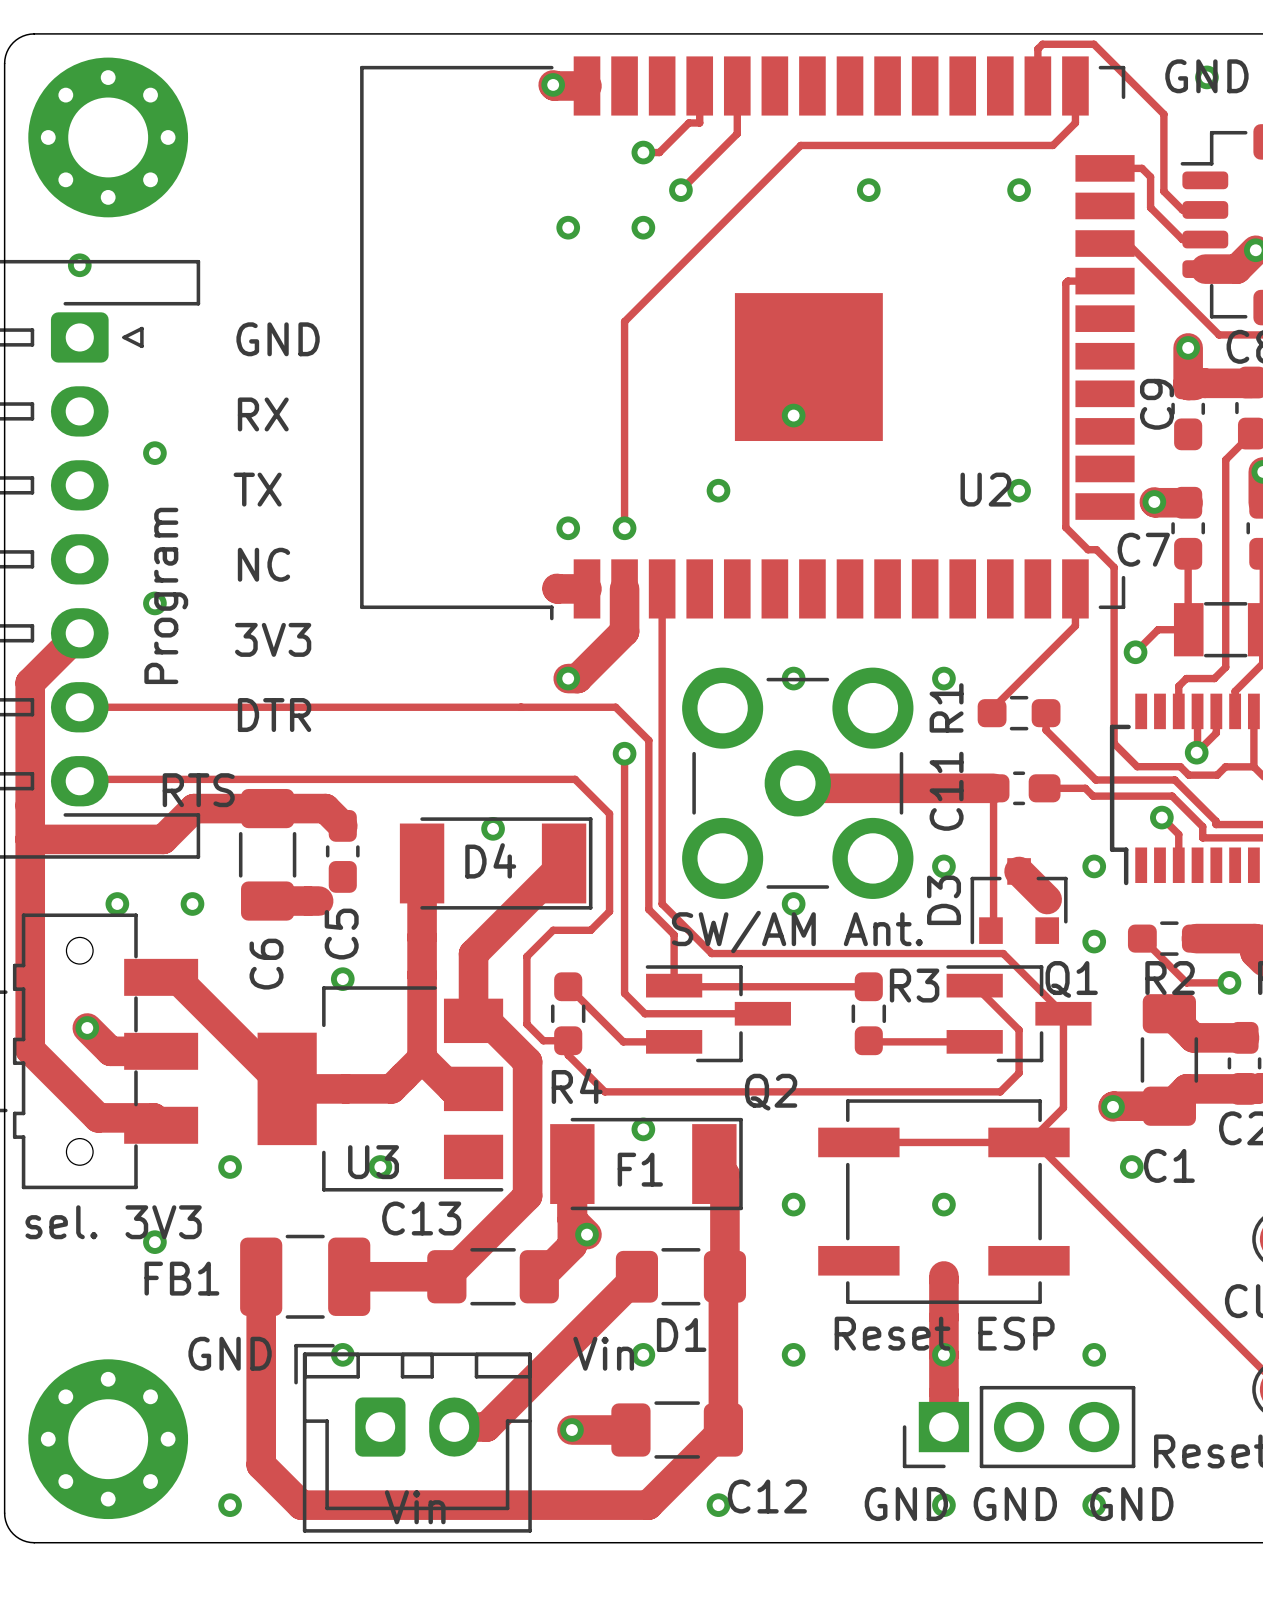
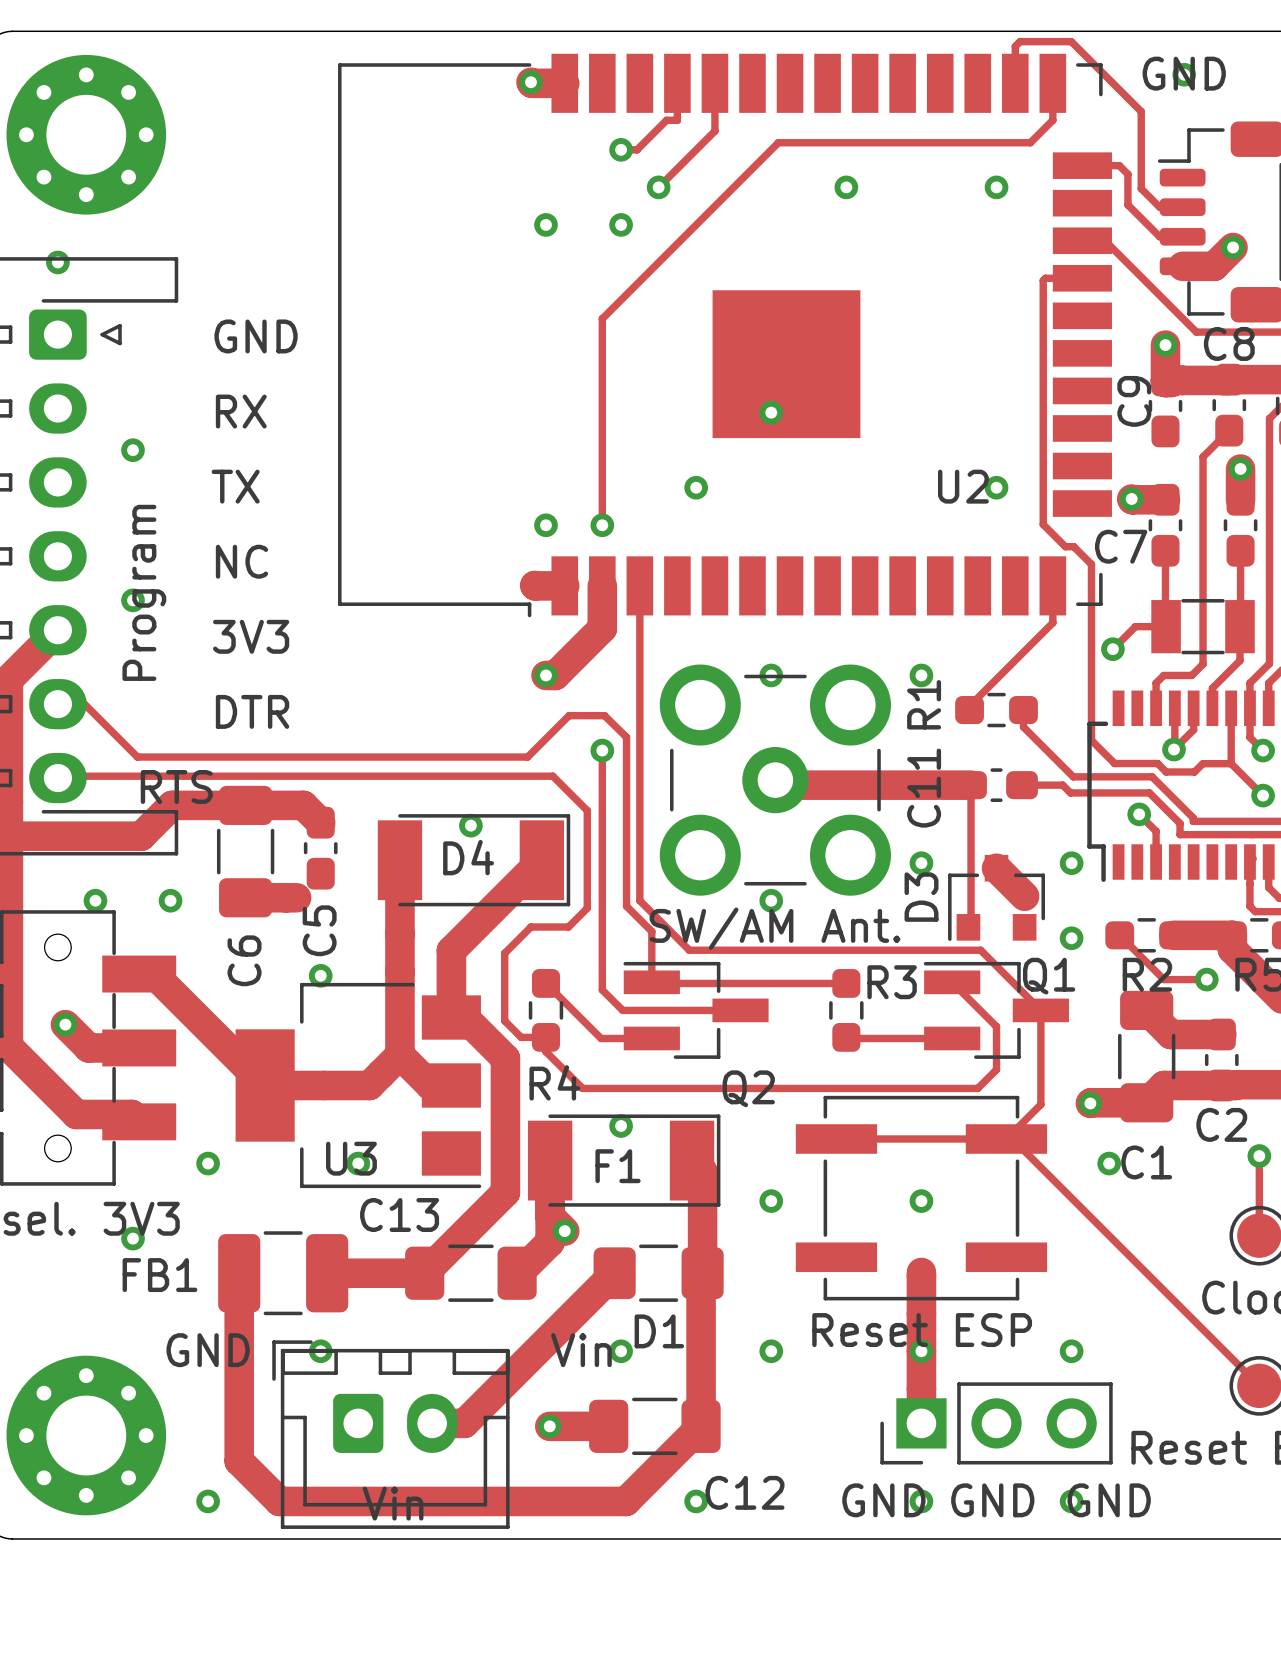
track: (106, 707) (615, 707) (648, 740) -> (84, 704) (137, 757) (527, 757) (569, 715) (604, 715) (626, 737)

